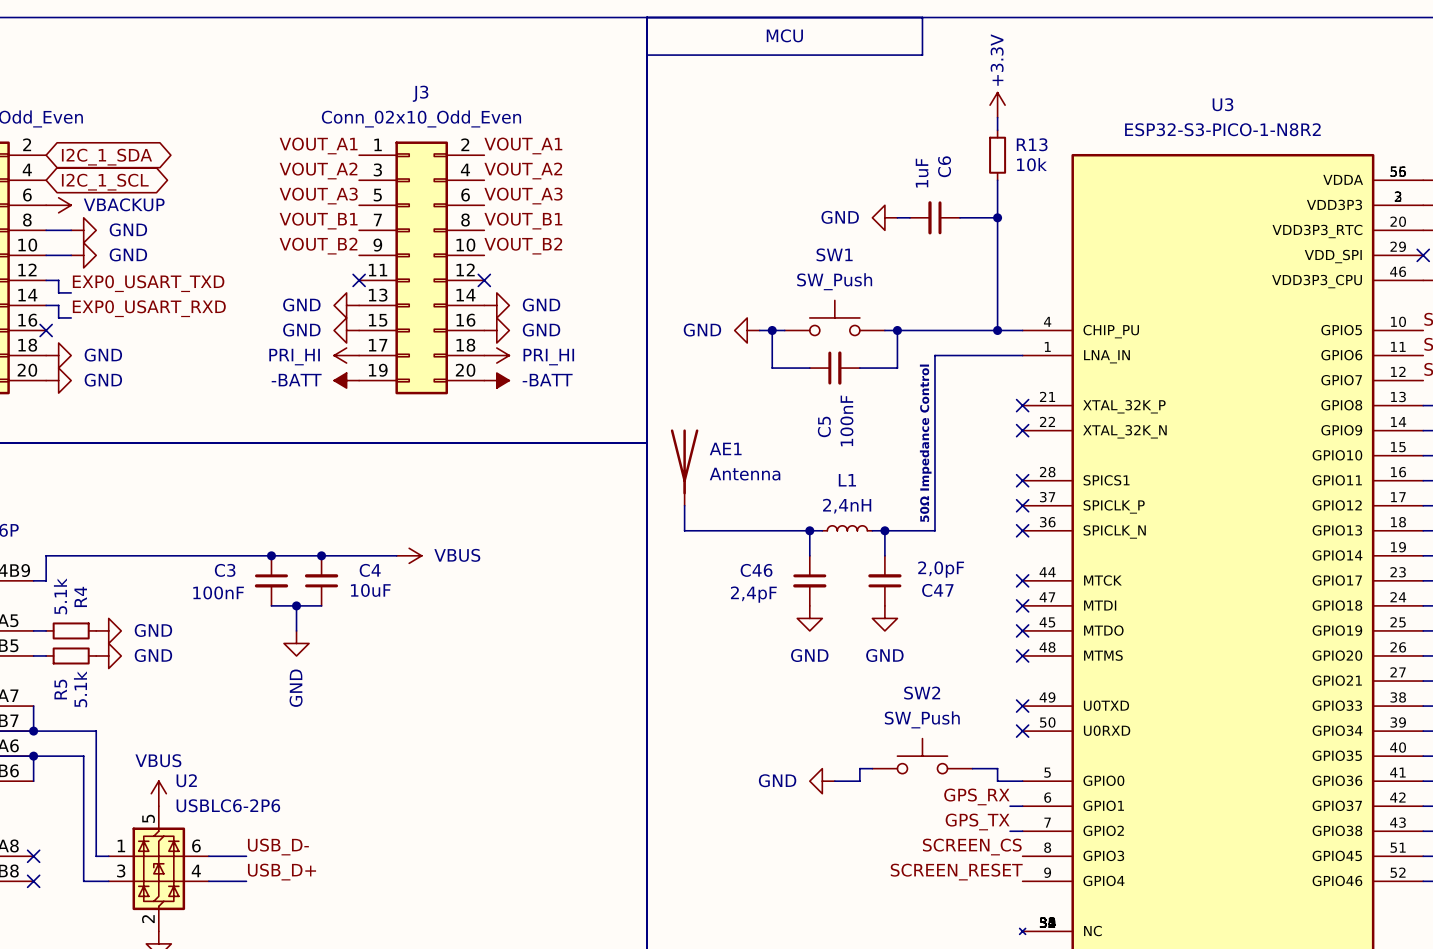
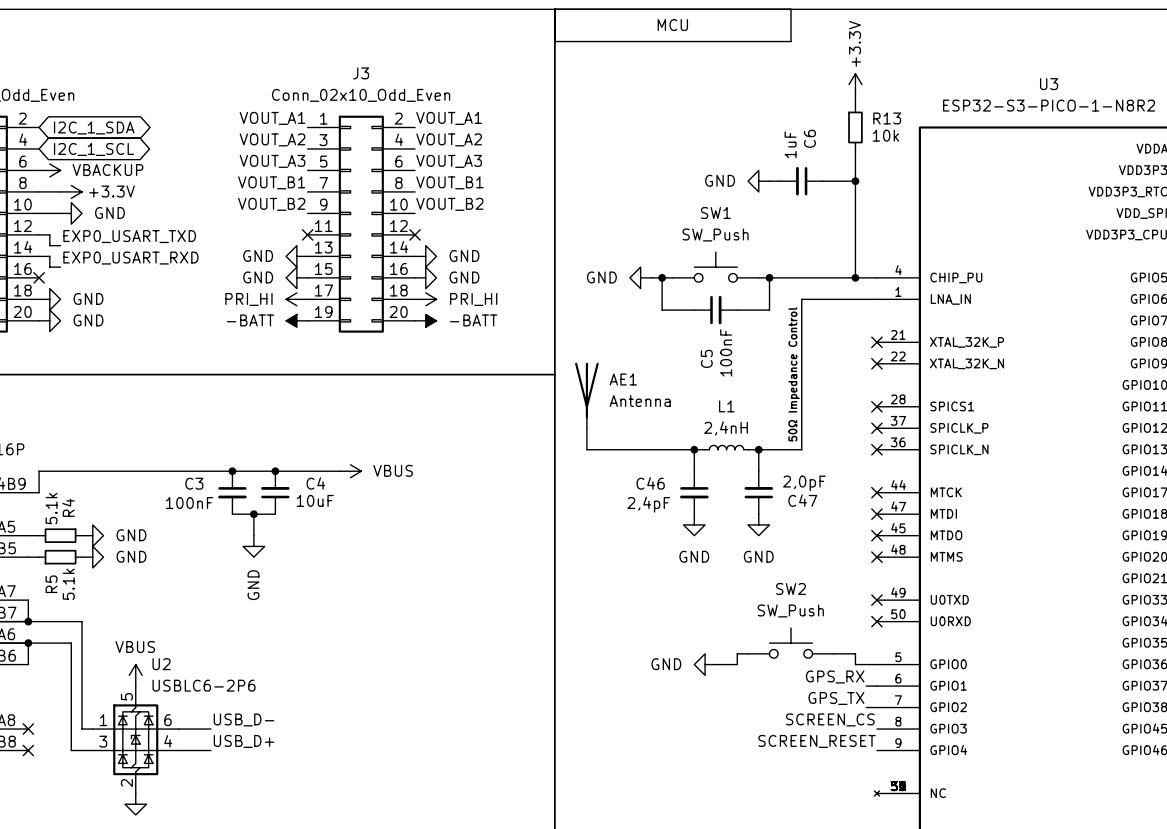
power symbol: GND (83, 230) -> +3.3V (71, 191)

